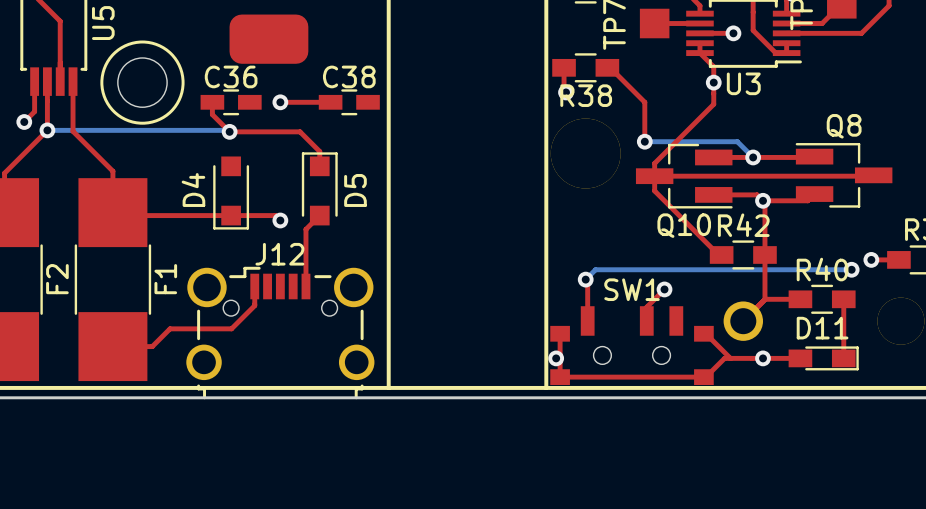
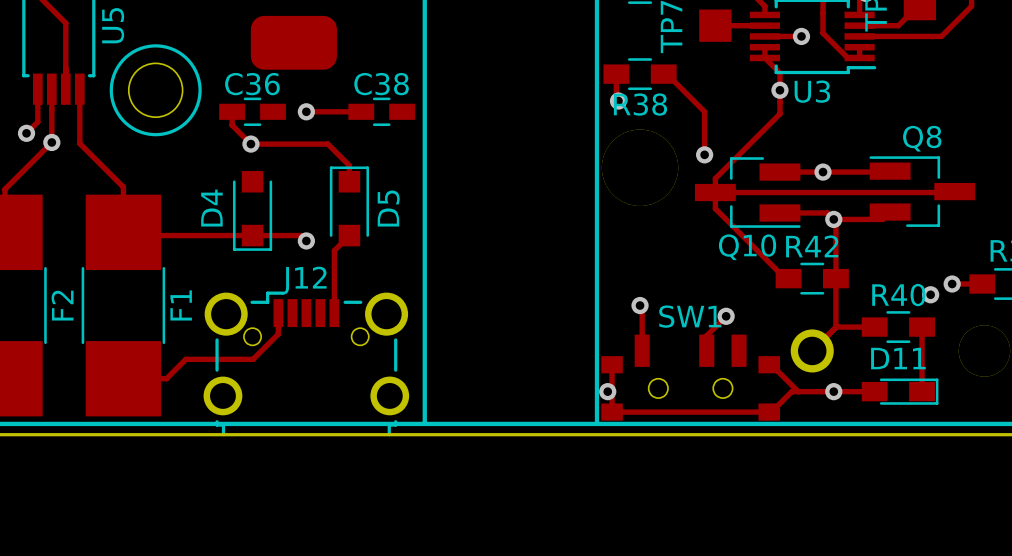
bottom track: (47, 130) (229, 131) -> none
bottom track: (644, 141) (737, 141) (753, 157) -> none
bottom track: (851, 269) (595, 269) (585, 279) -> none

